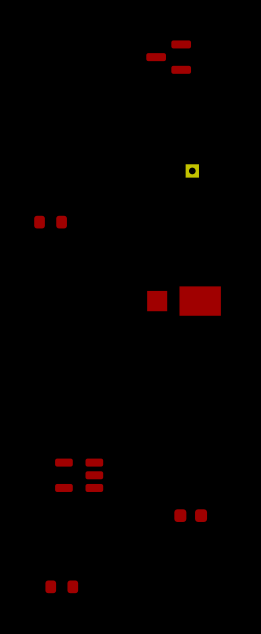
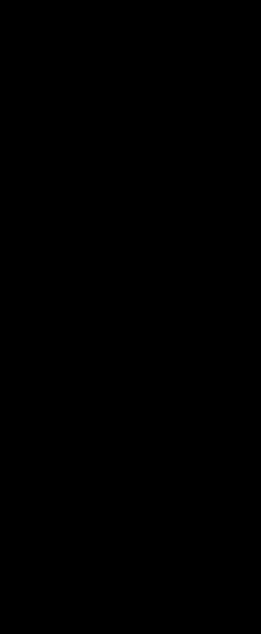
part: (168, 57) -> none
part: (192, 170) -> none
part: (50, 222) -> none
part: (184, 301) -> none
part: (79, 475) -> none
part: (190, 515) -> none
part: (61, 586) -> none

